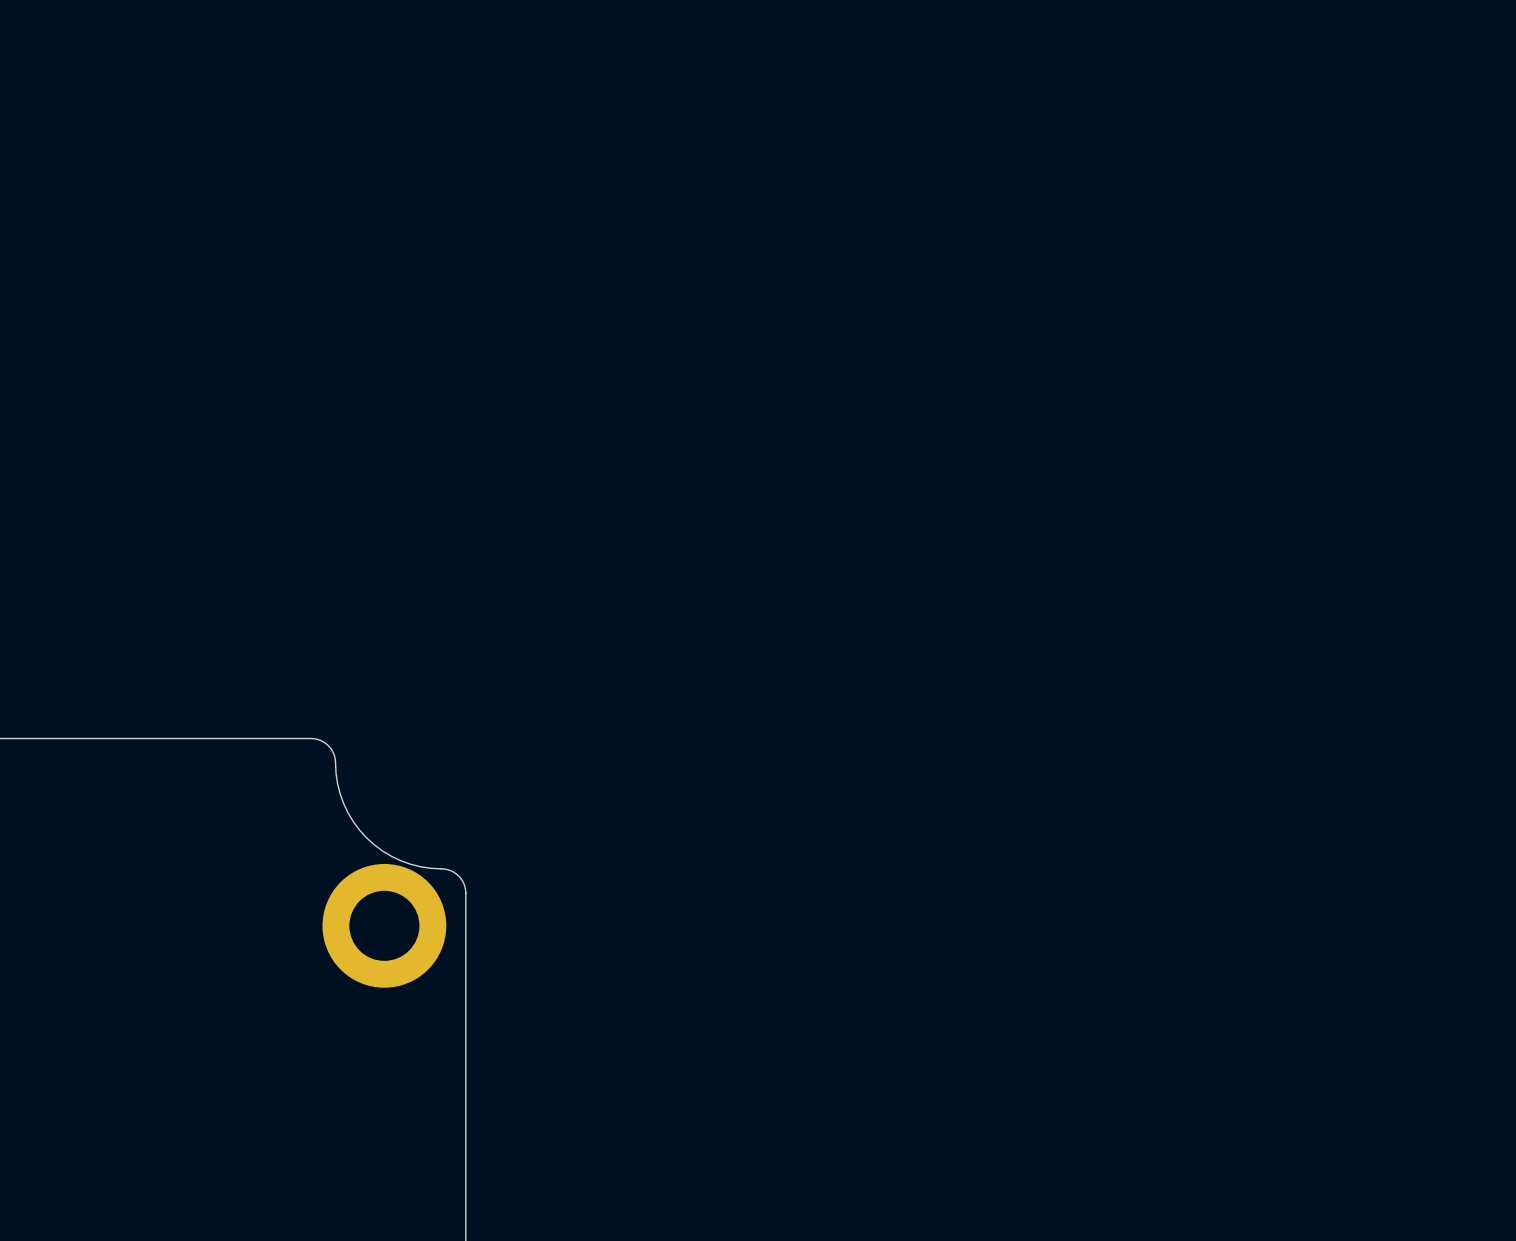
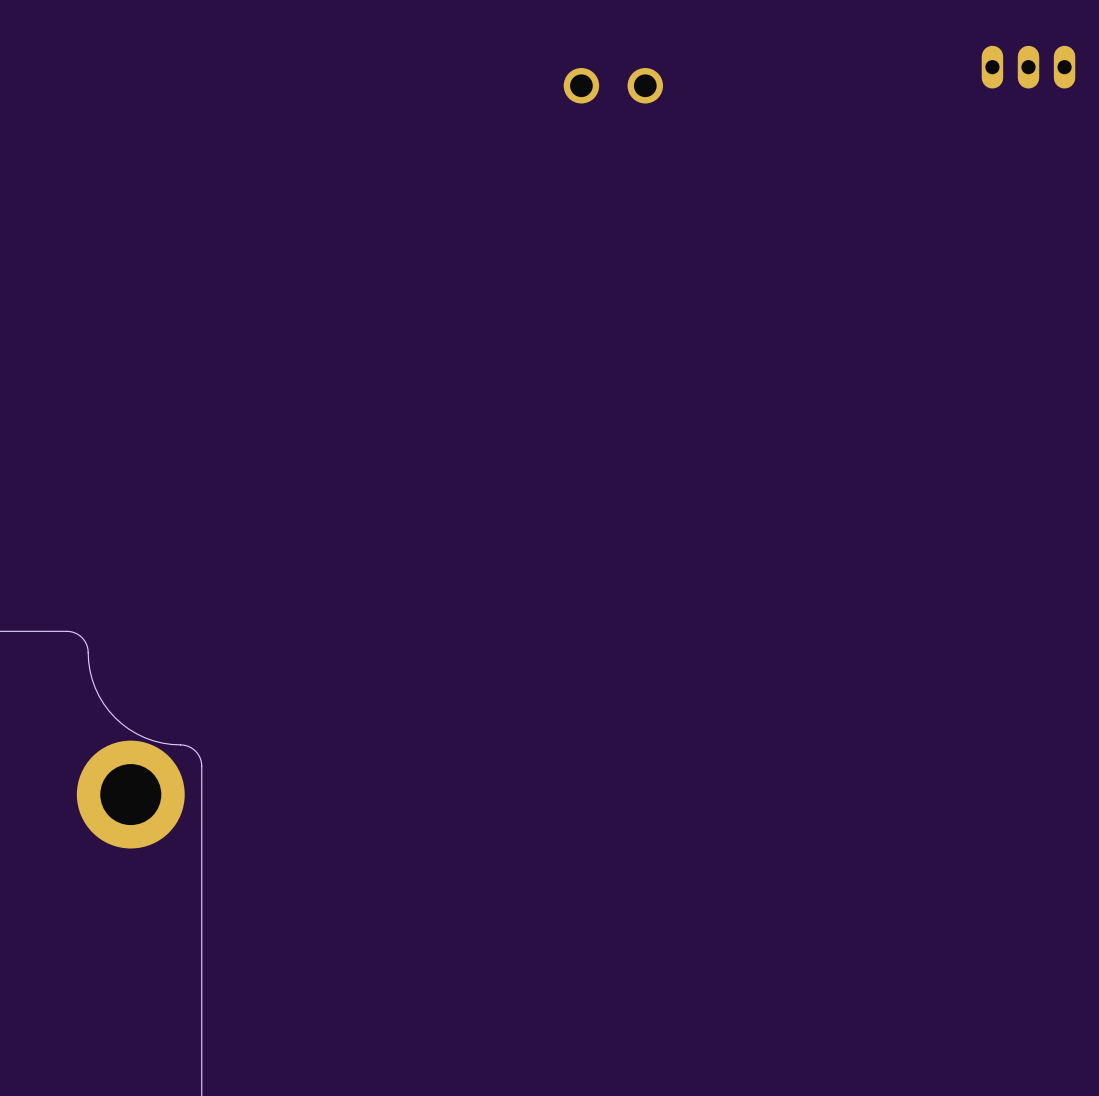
part: none -> (1028, 67)
part: none -> (613, 85)

